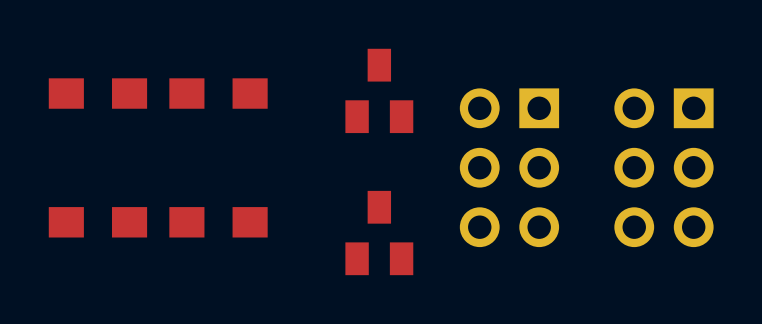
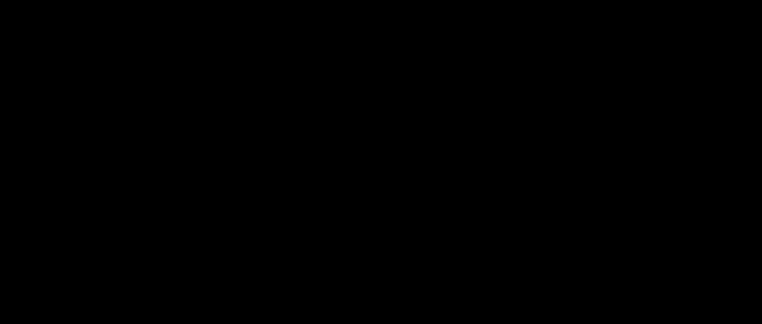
part: (379, 90) -> none
part: (97, 93) -> none
part: (218, 93) -> none
part: (509, 167) -> none
part: (663, 167) -> none
part: (97, 222) -> none
part: (218, 222) -> none
part: (379, 233) -> none

